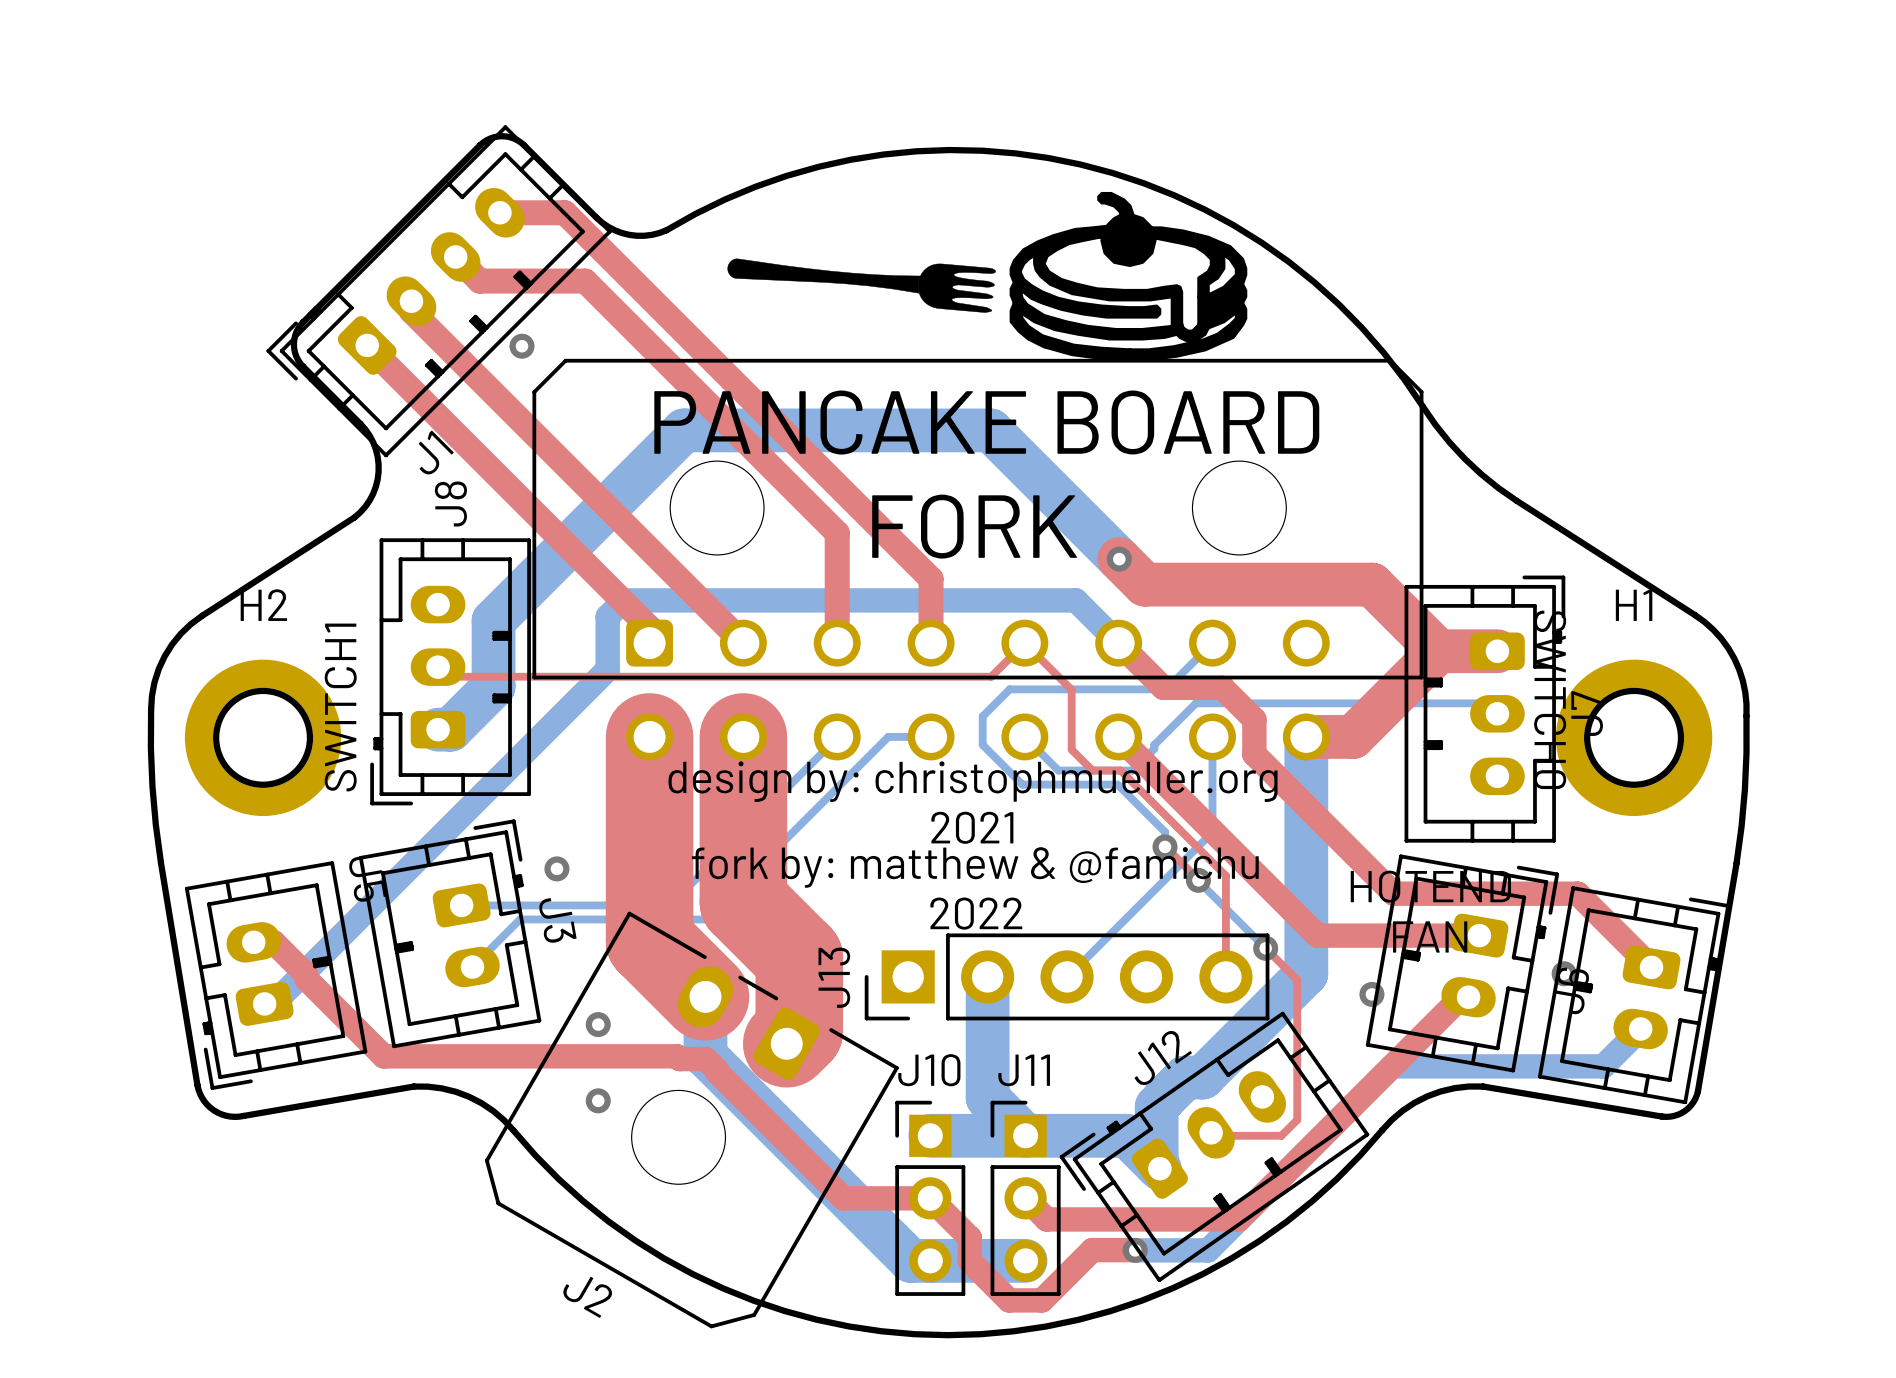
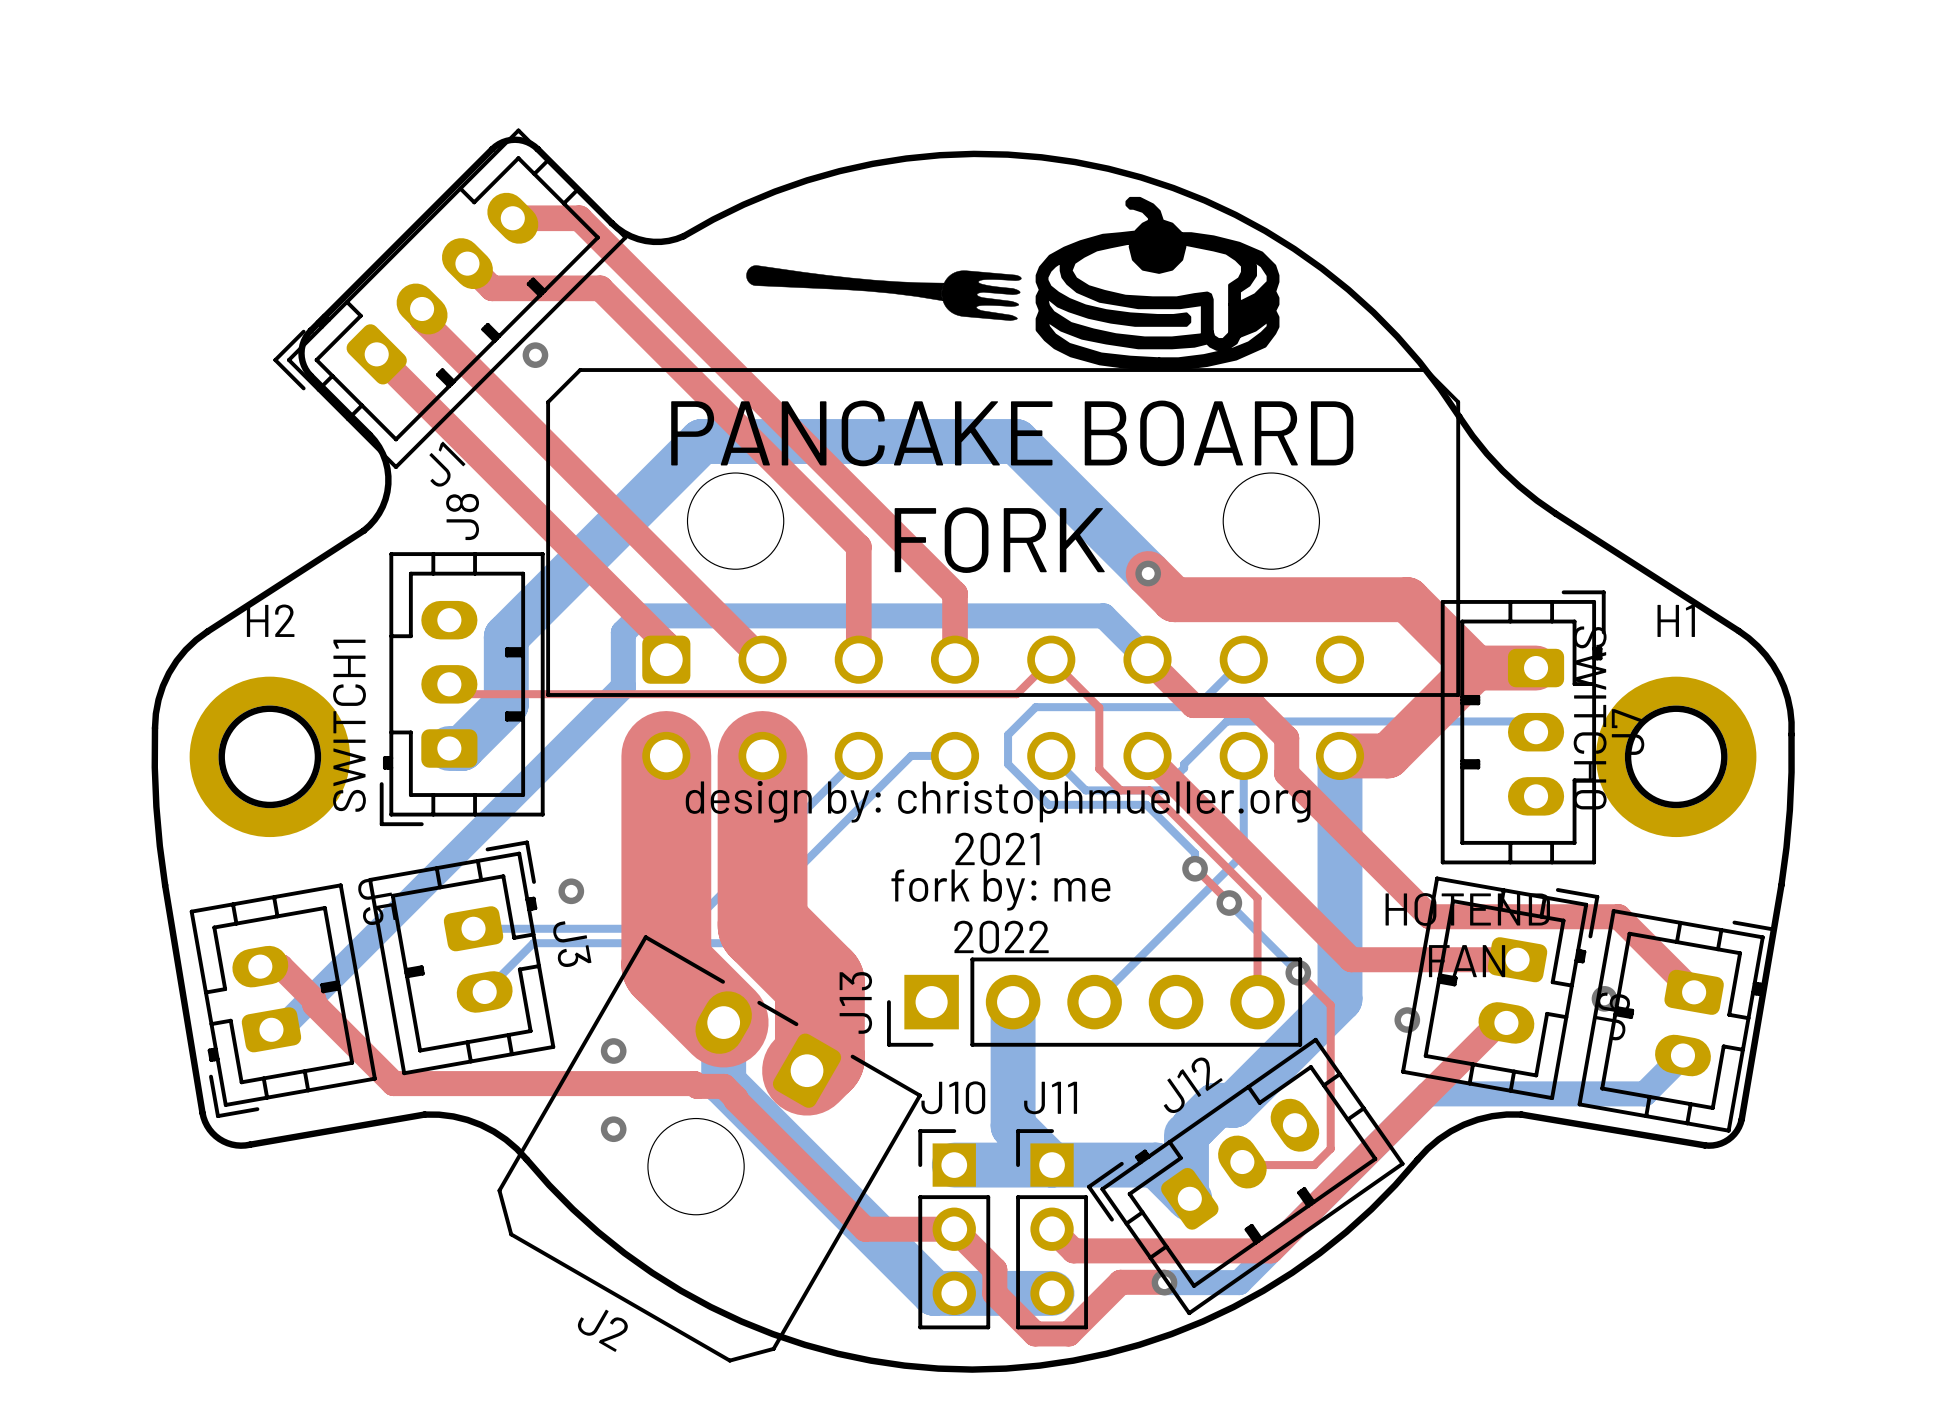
text: fork by: matthew & @famichu (975, 867) -> fork by: me (1000, 890)

